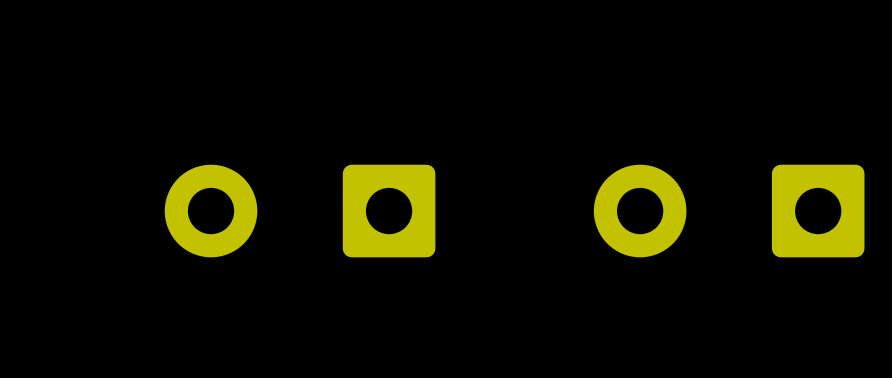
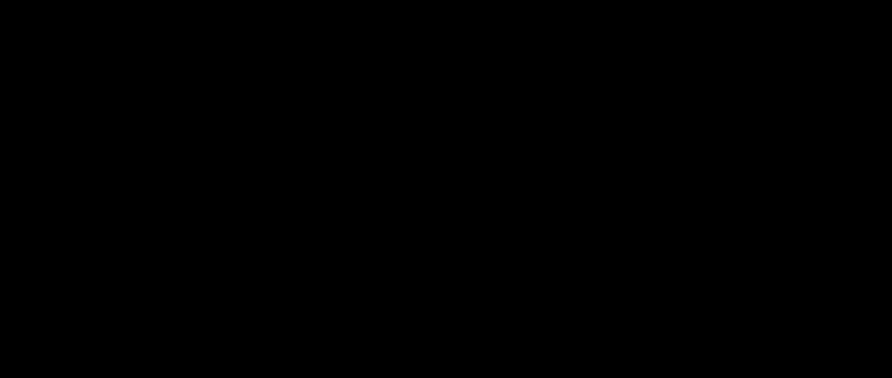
part: (300, 211) -> none
part: (729, 211) -> none

